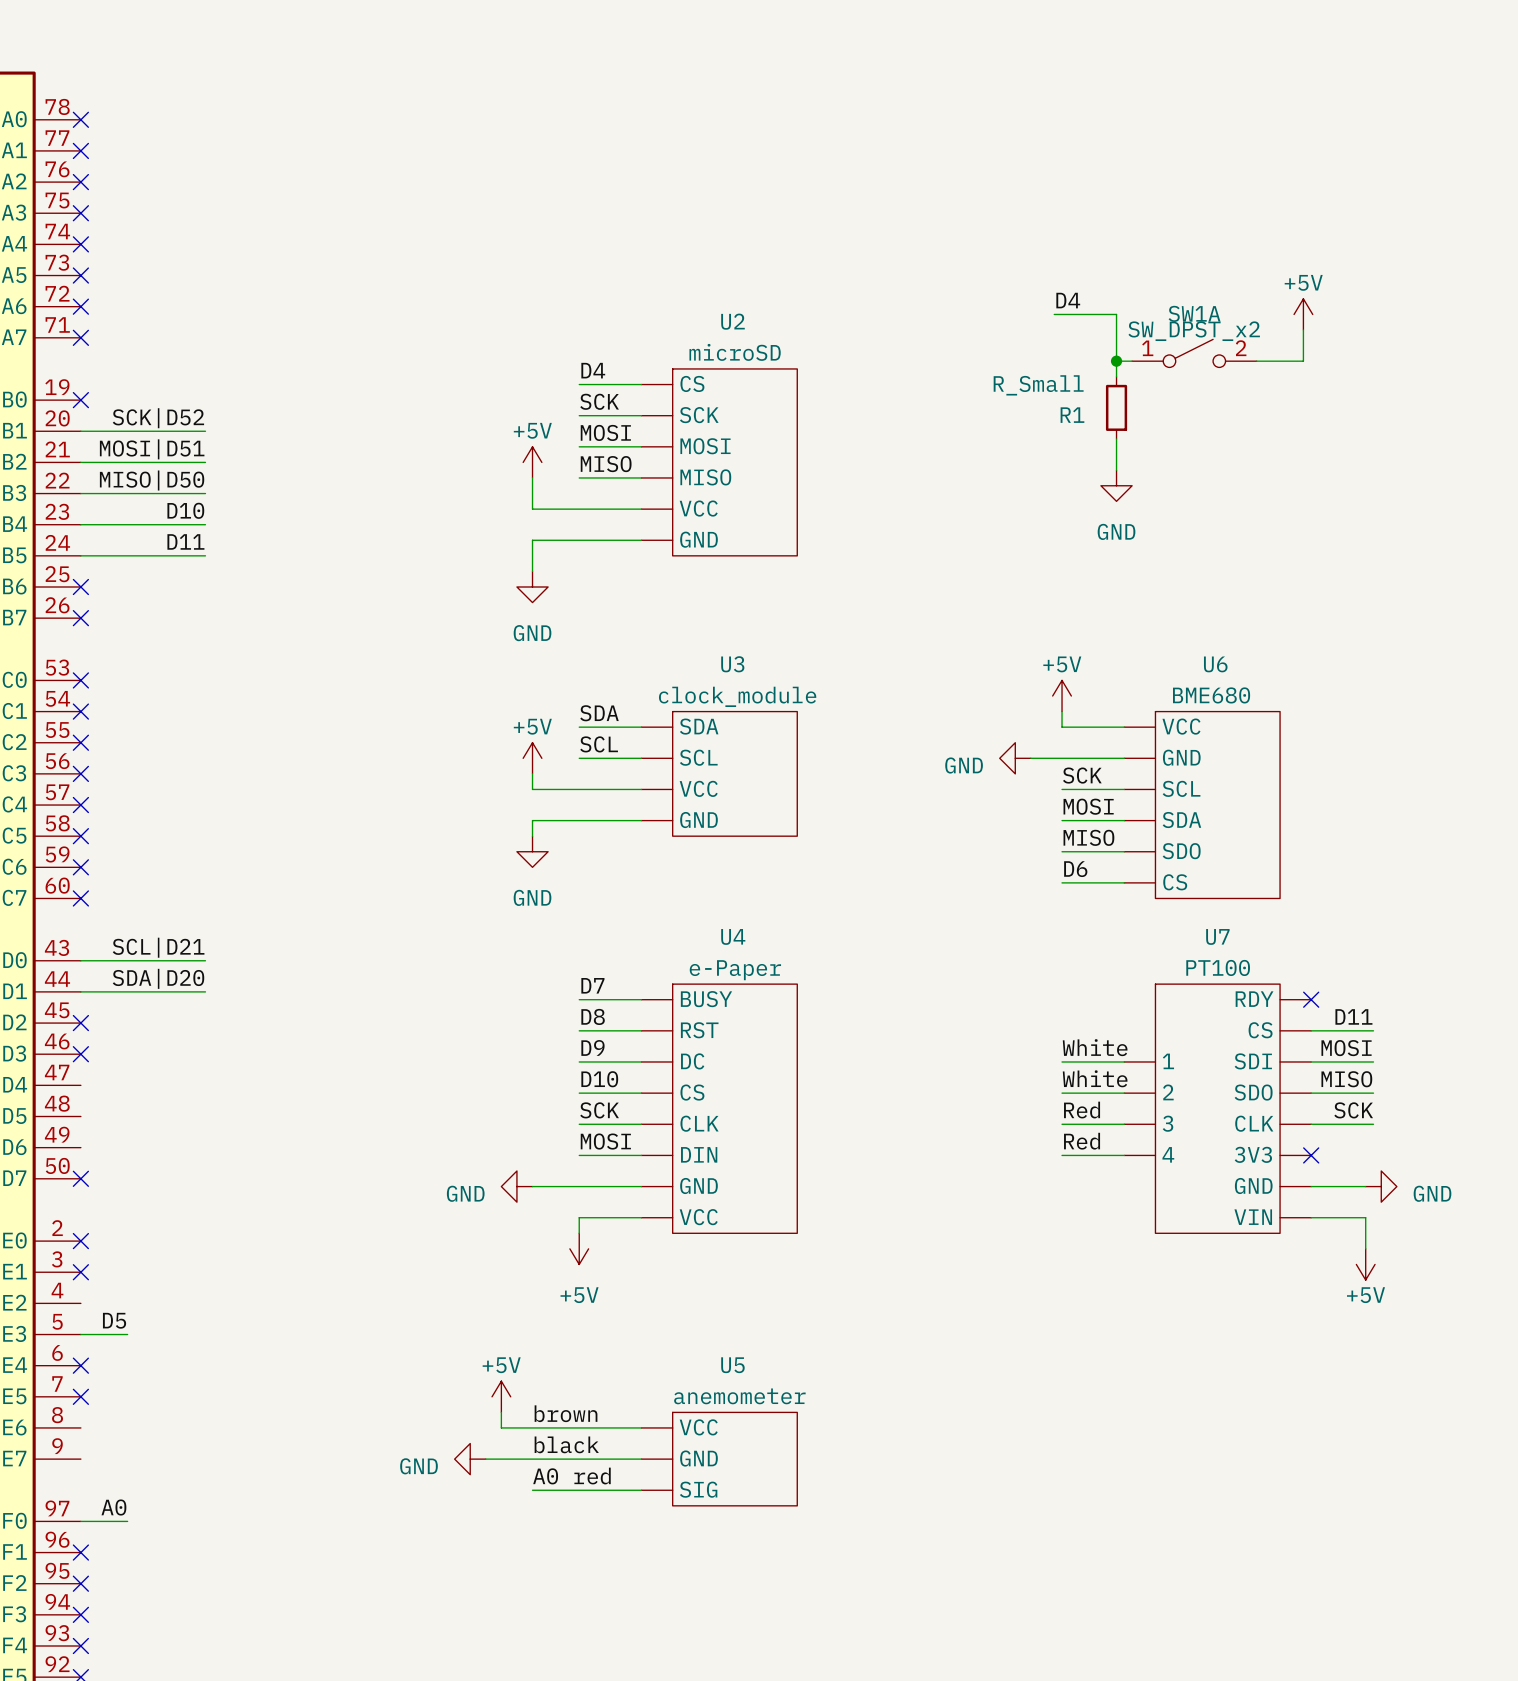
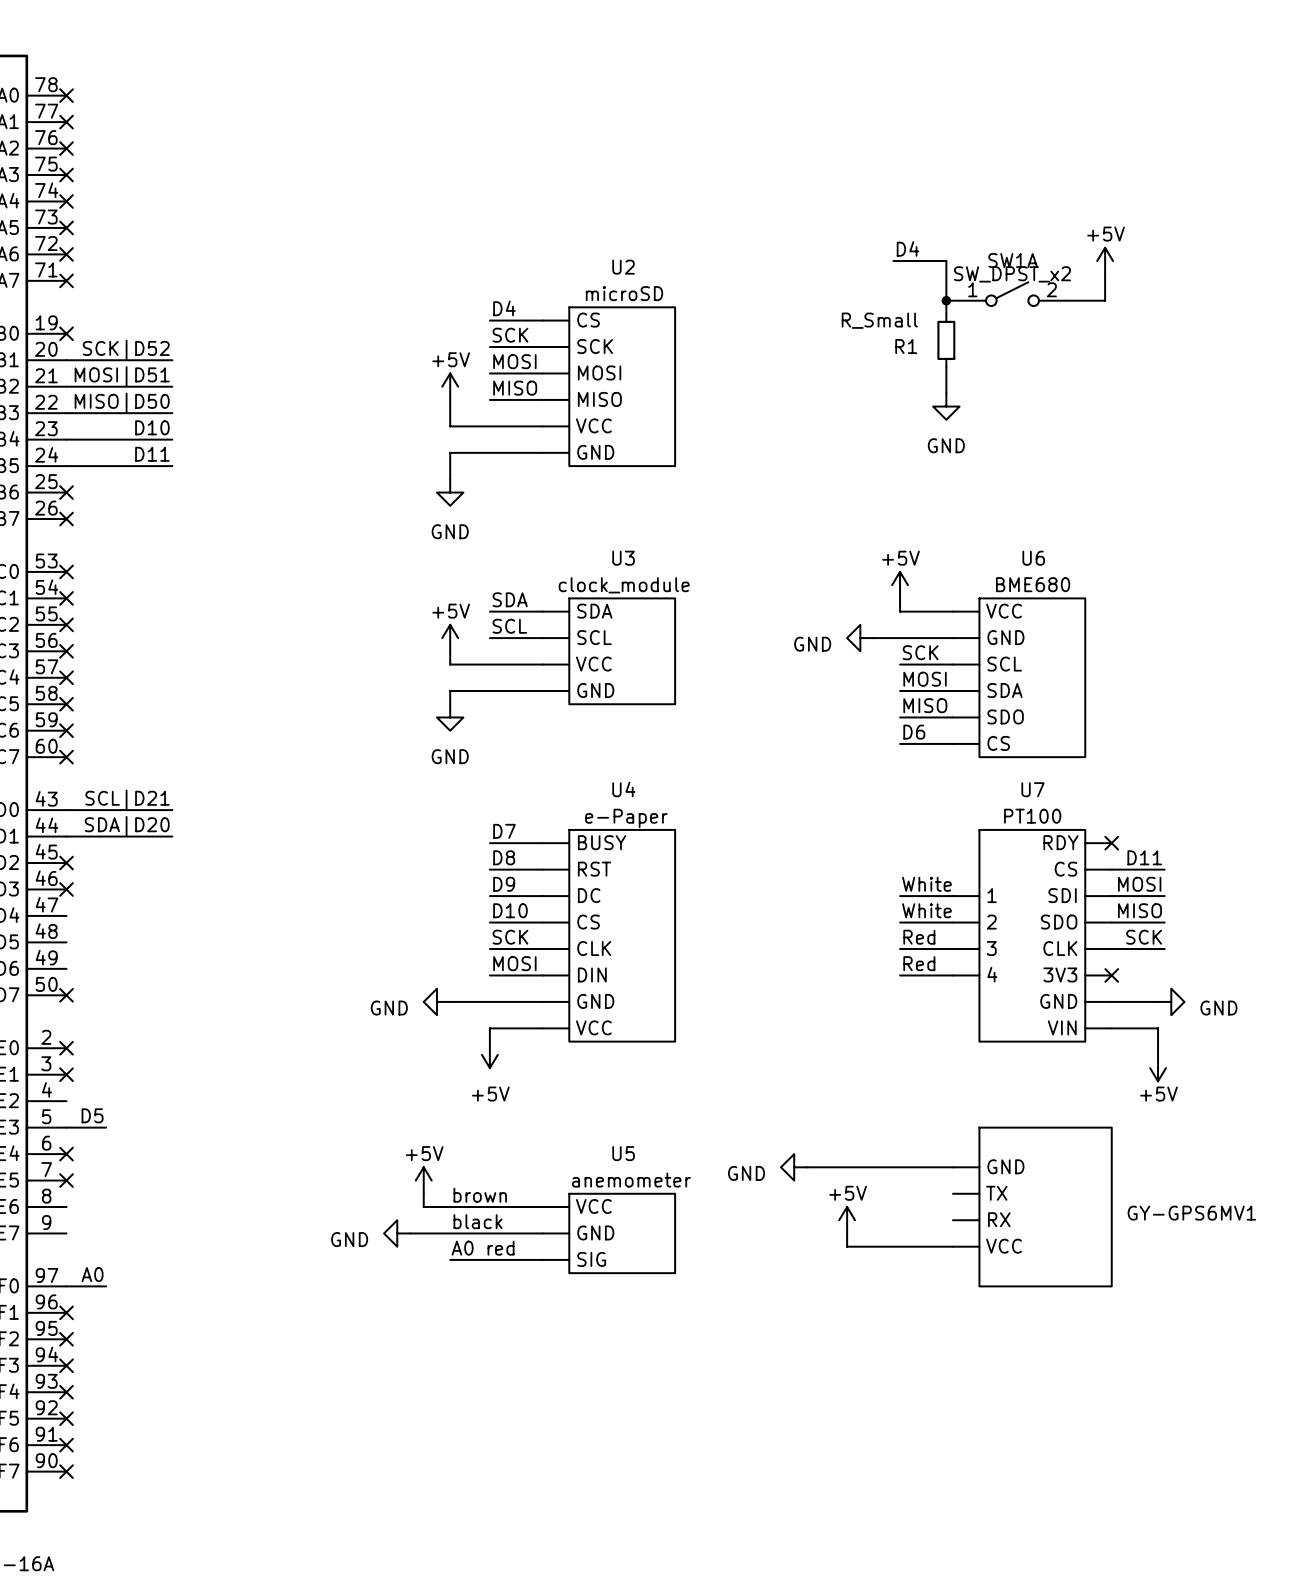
power symbol: none -> GND (794, 1167)
wire: none -> (807, 1167) (952, 1167)
GY-GPS6MV1: none -> (1032, 1207)
power symbol: none -> +5V (847, 1220)
wire: none -> (847, 1233) (847, 1246) (952, 1246)

